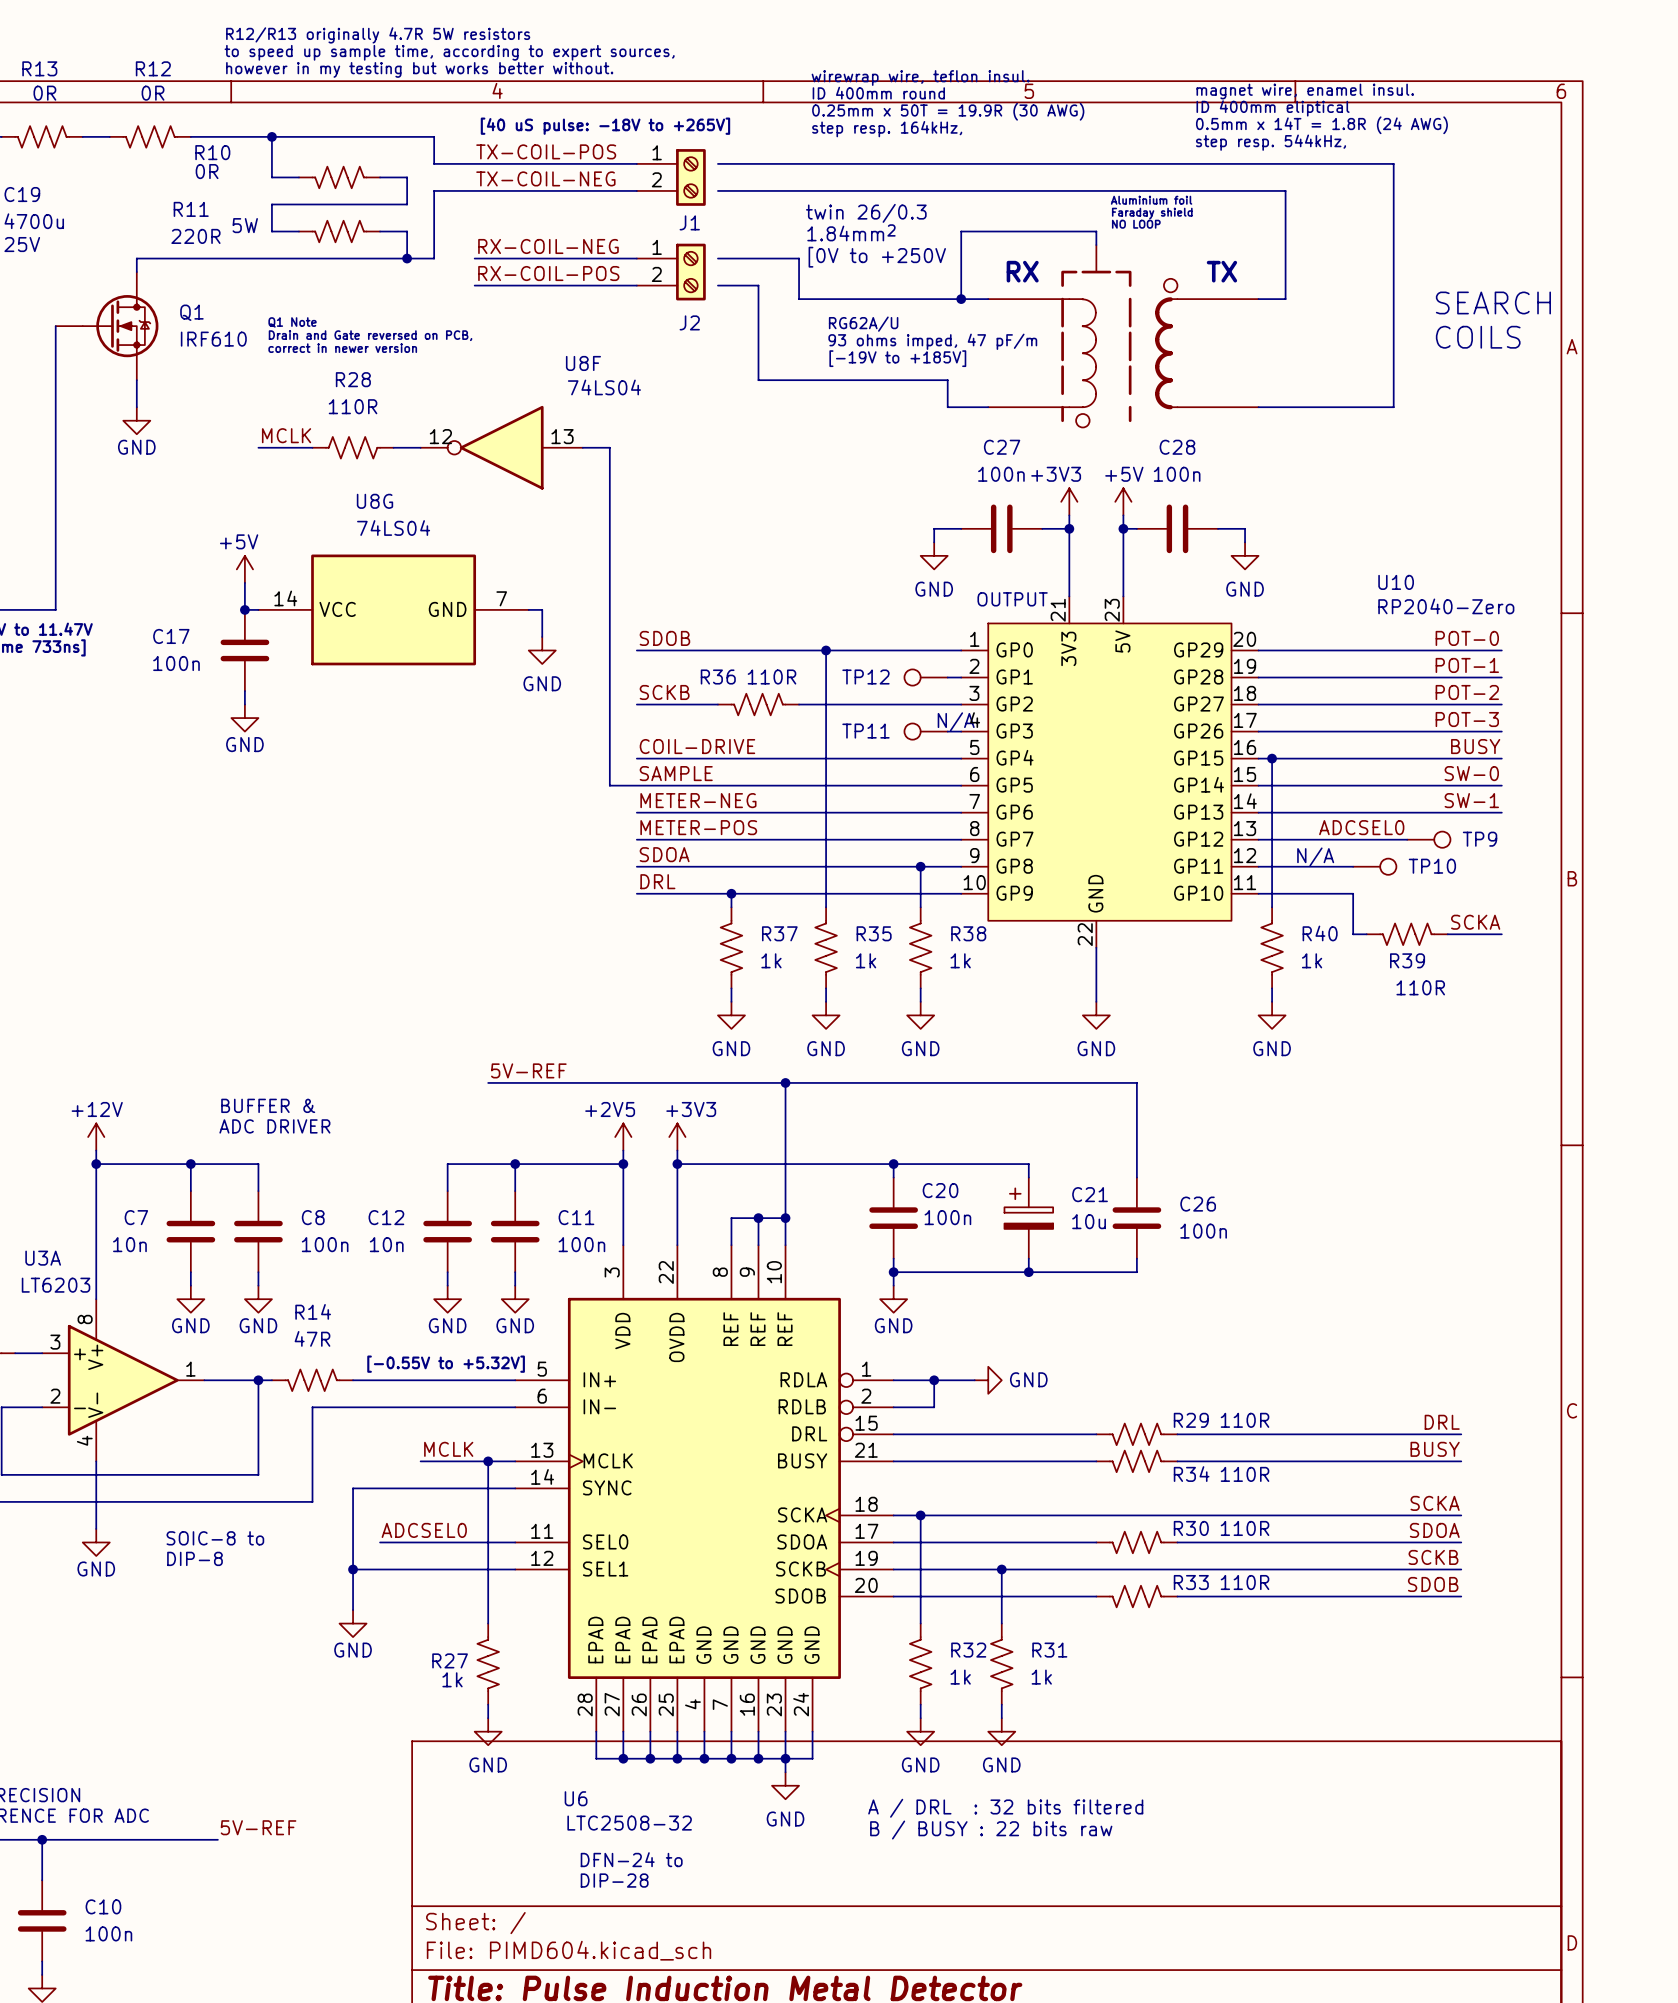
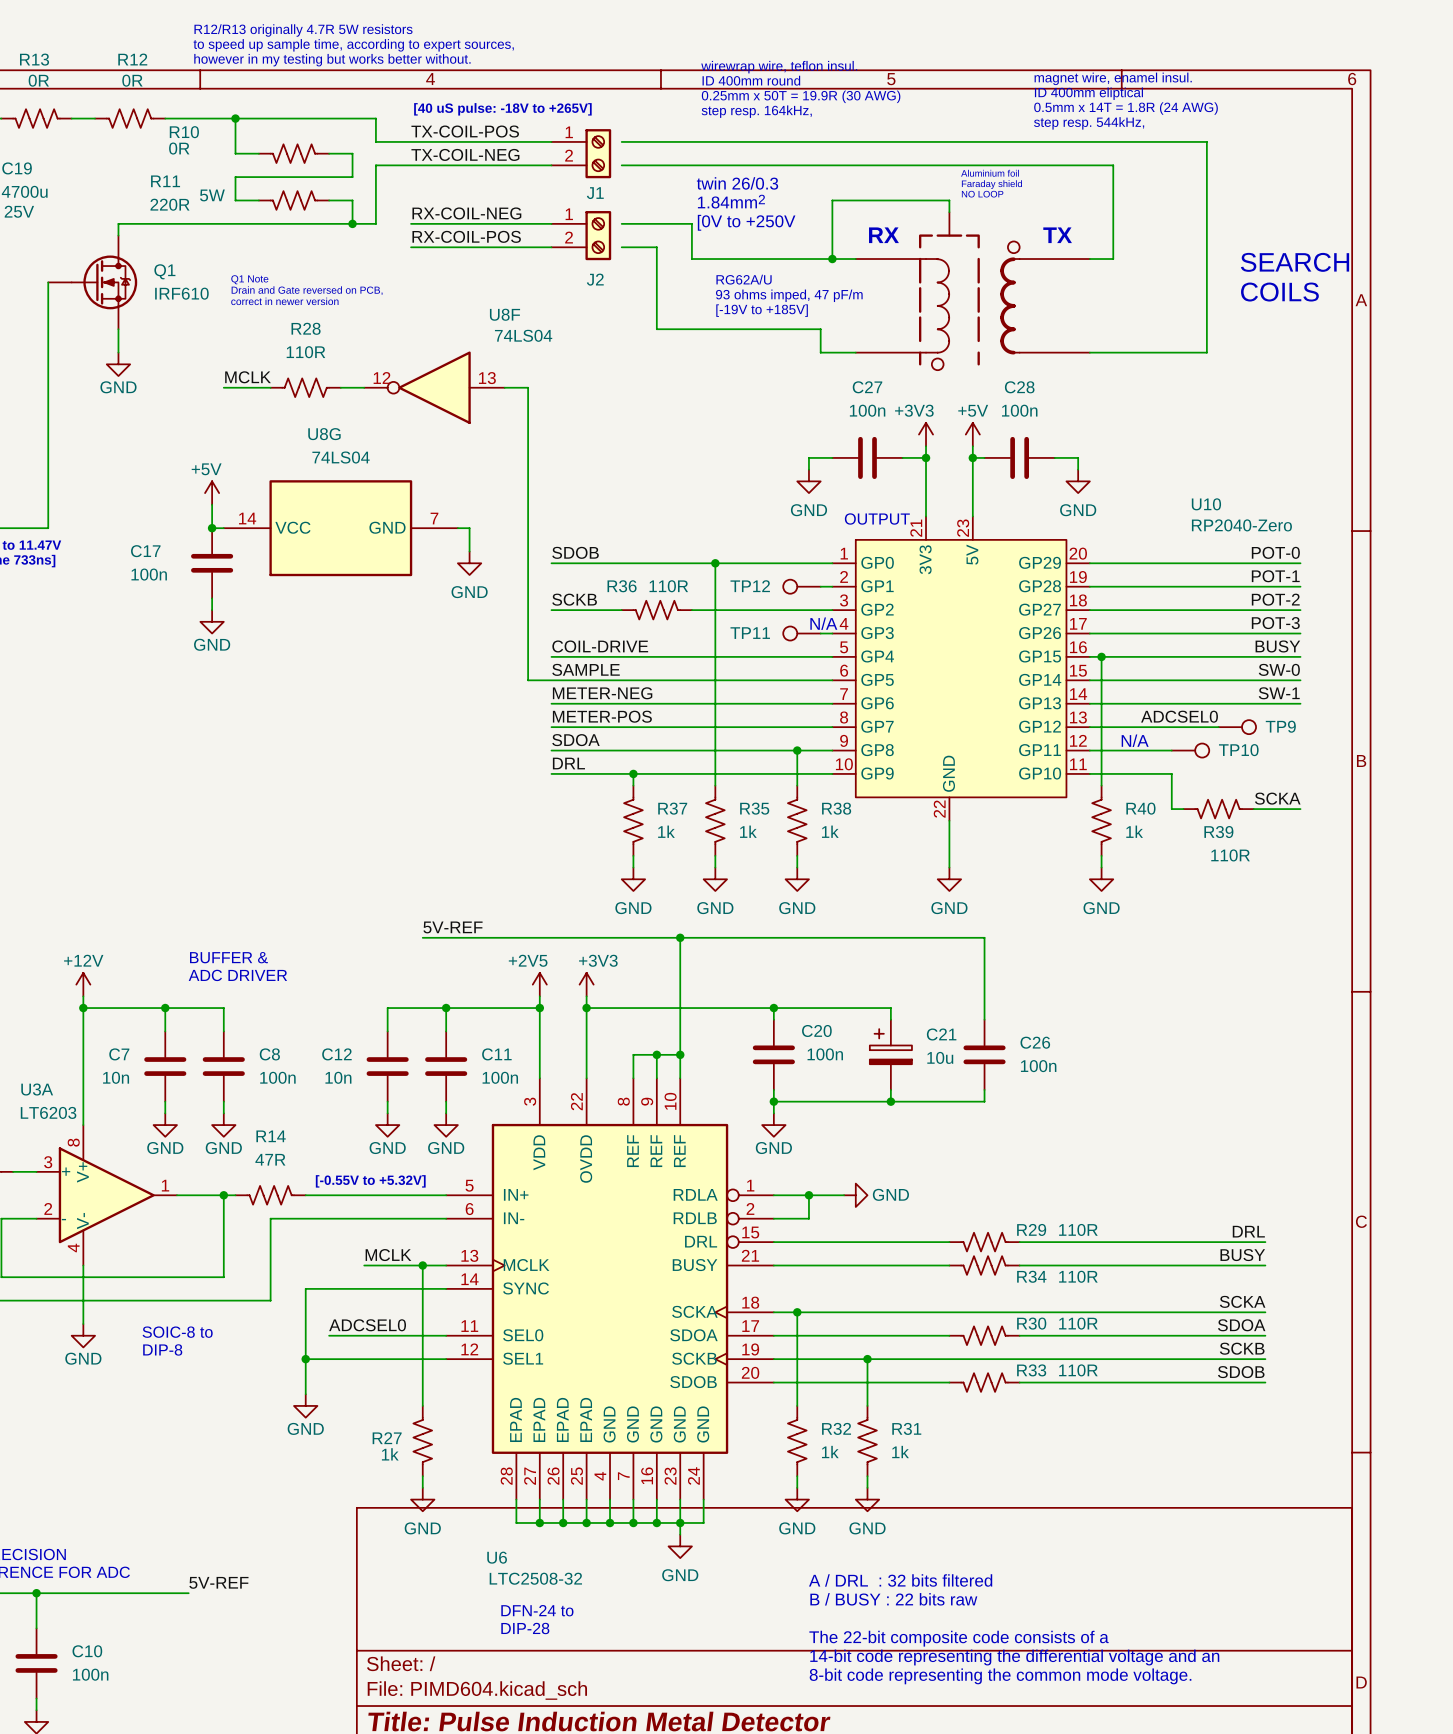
text position: A / DRL : 32 bits filtered (1005, 1808) -> A / DRL : 32 bits filtered (900, 1580)
text position: B / BUSY : 22 bits raw (991, 1830) -> B / BUSY : 22 bits raw (893, 1599)
text: none -> The 22-bit composite code consists of a (959, 1638)
text: none -> 14-bit code representing the differential voltage and an (1014, 1657)
text: none -> 8-bit code representing the common mode voltage. (1000, 1676)

